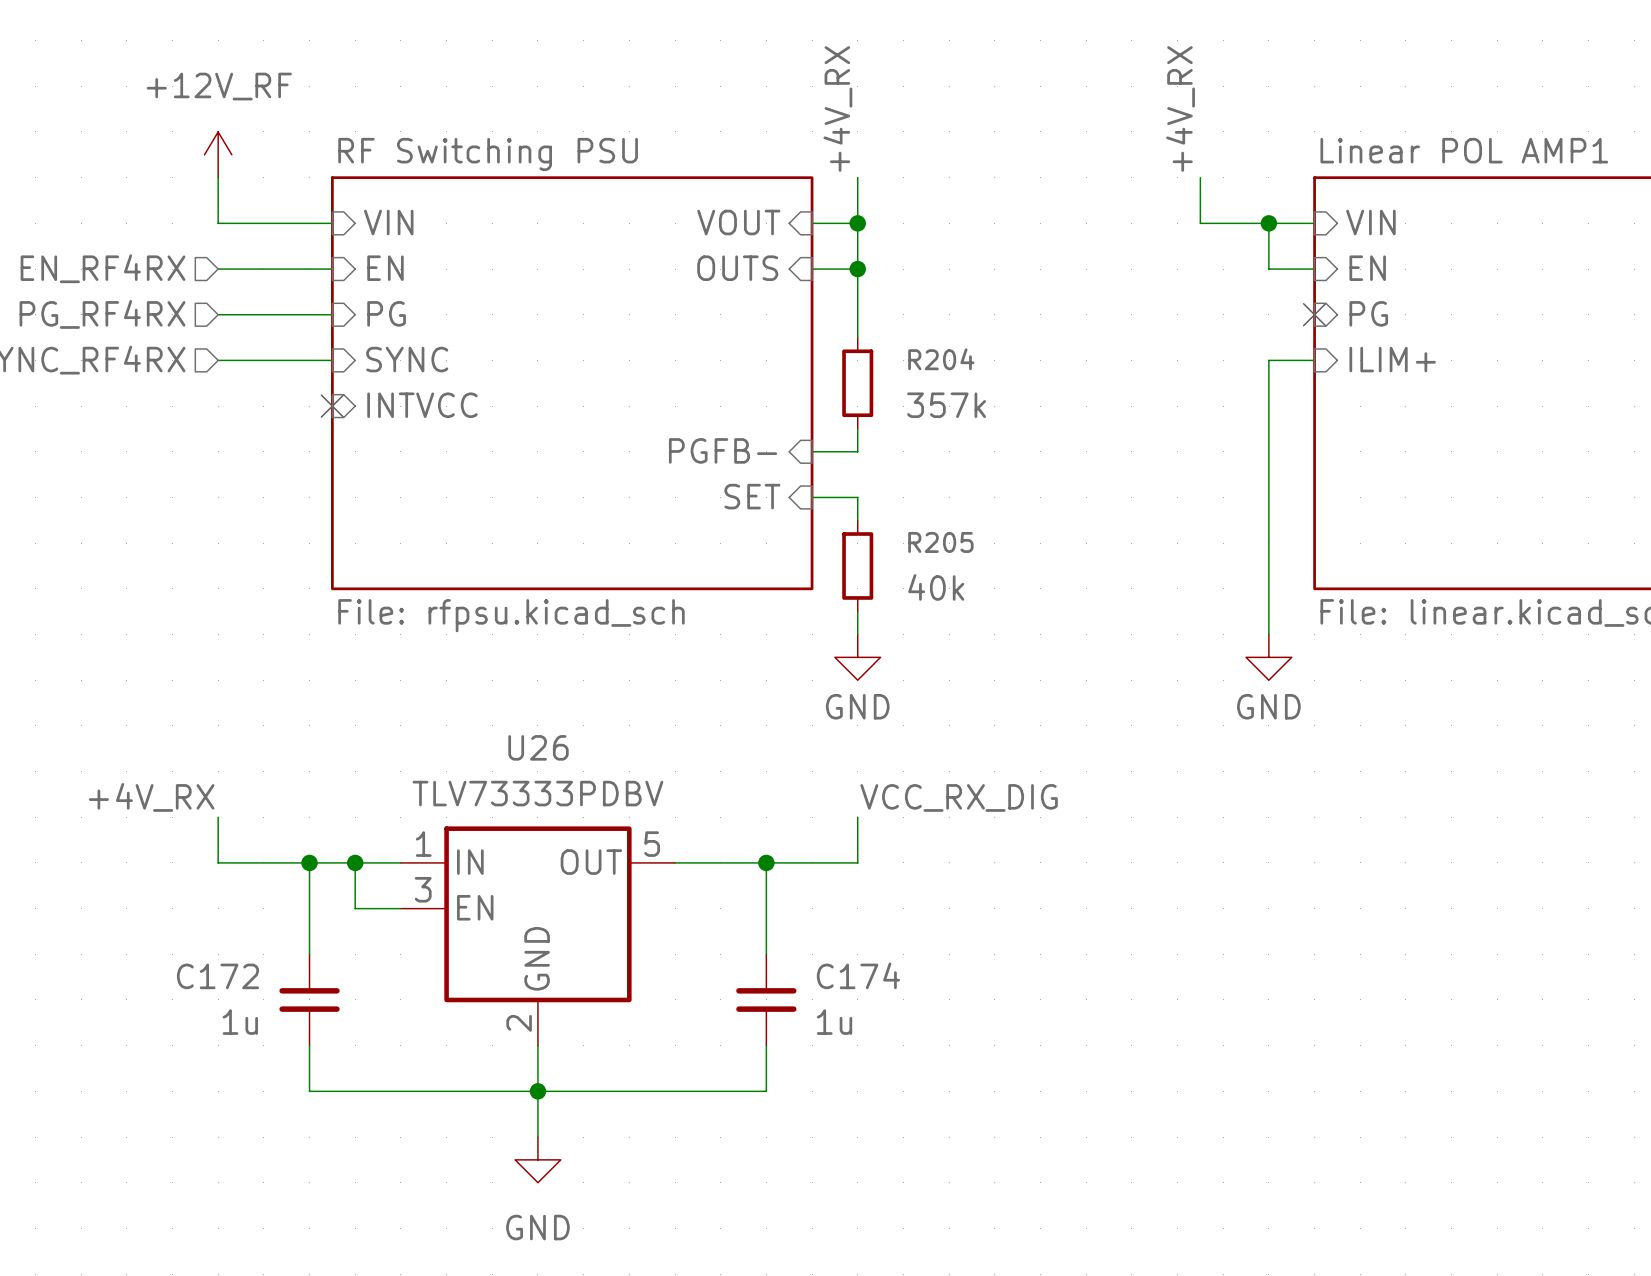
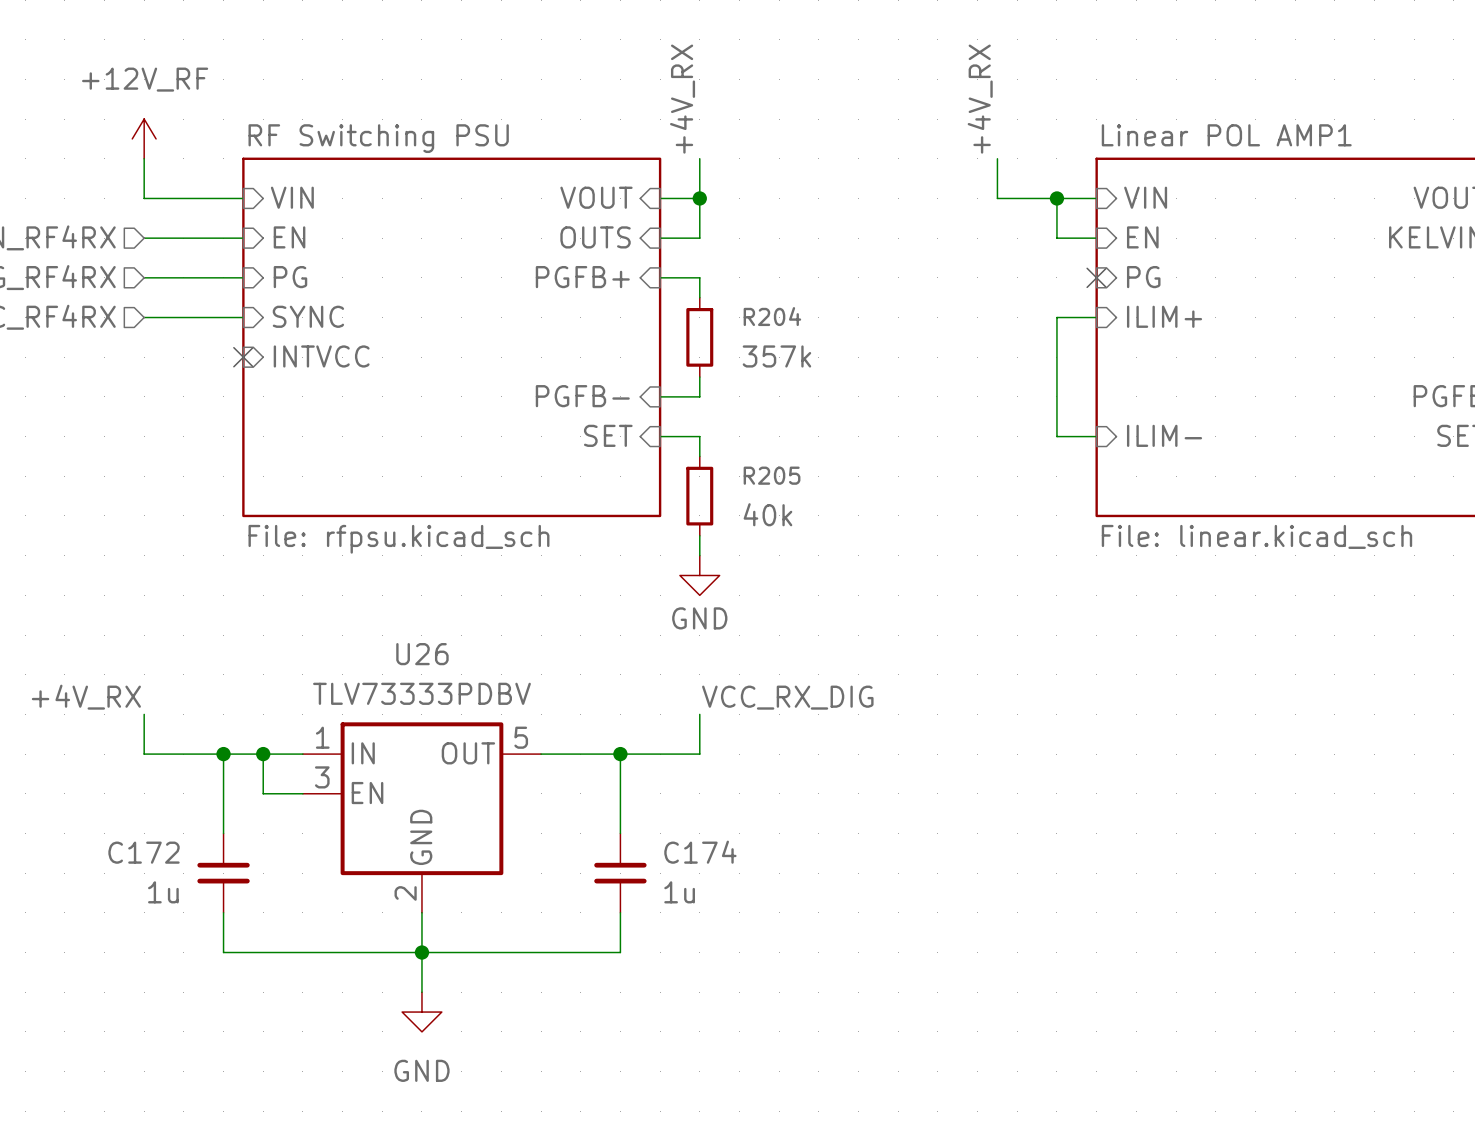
wire: (857, 269) (857, 314) -> (660, 277) (699, 277)
junction: (857, 269) -> none
sheet pin: none -> PGFB+ (582, 277)
sheet pin: none -> ILIM- (1164, 435)
wire: (1268, 497) (1268, 634) -> (1056, 436) (1096, 436)
power symbol: GND (1268, 657) -> none

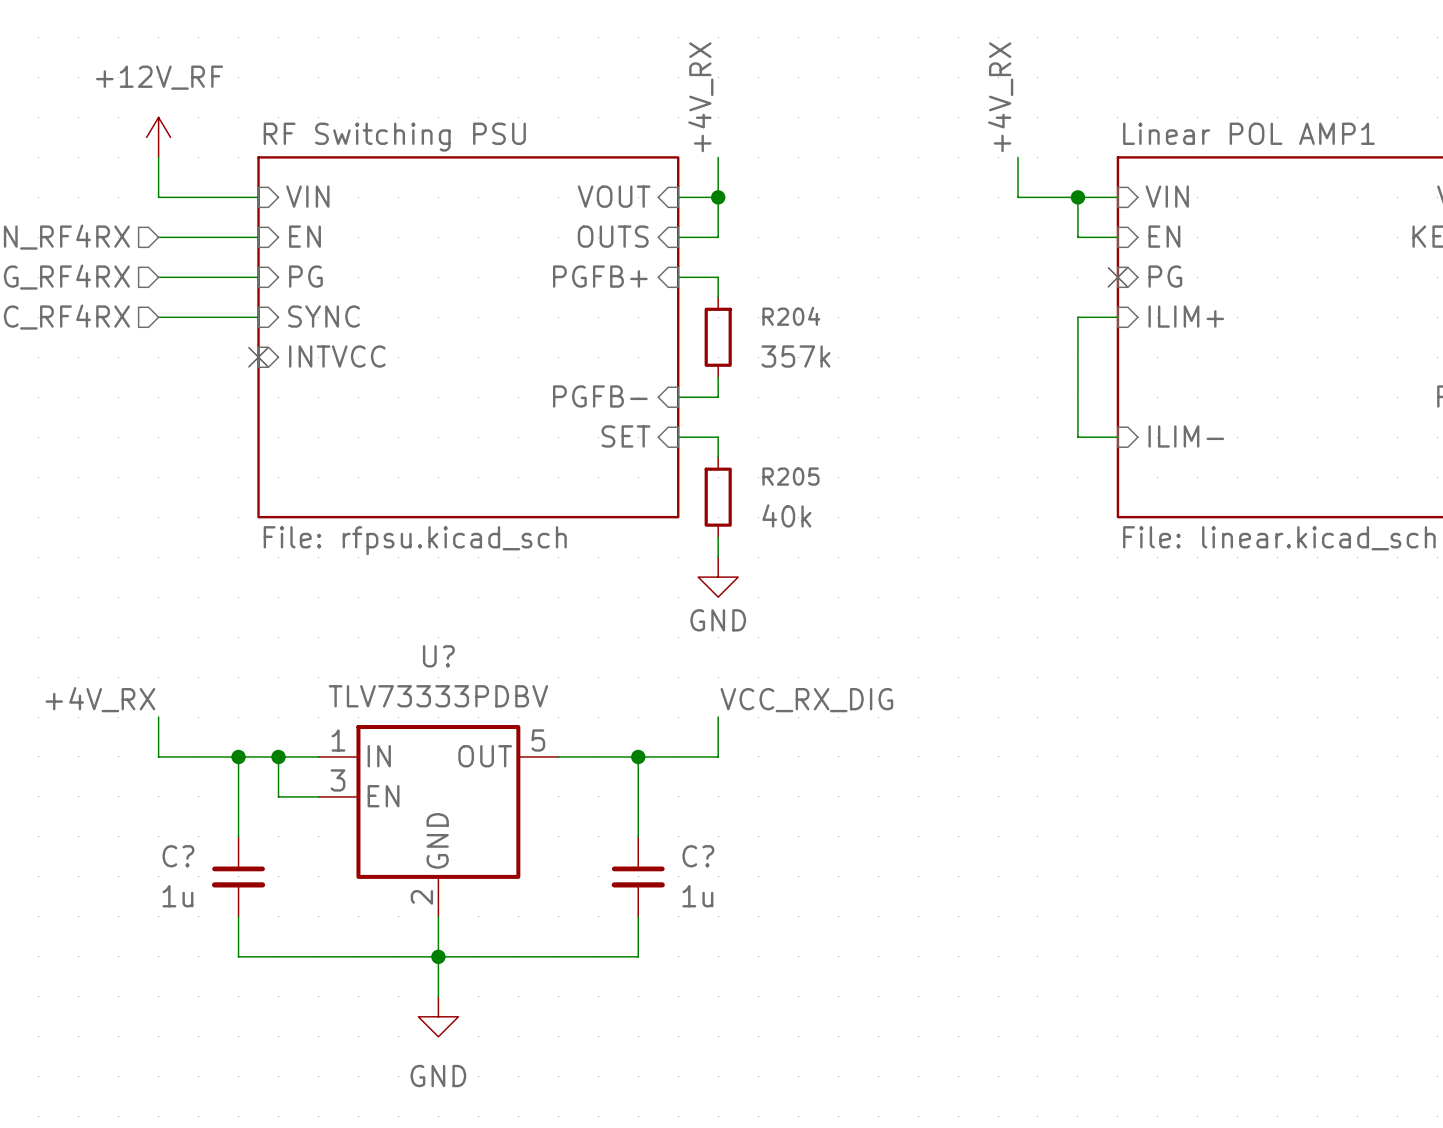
U26 name: U26 (422, 654) -> U? (438, 656)
C172: 1u (223, 873) -> none
C?: none -> 1u (238, 876)
C174: 1u (620, 873) -> none
C?: none -> 1u (638, 876)

